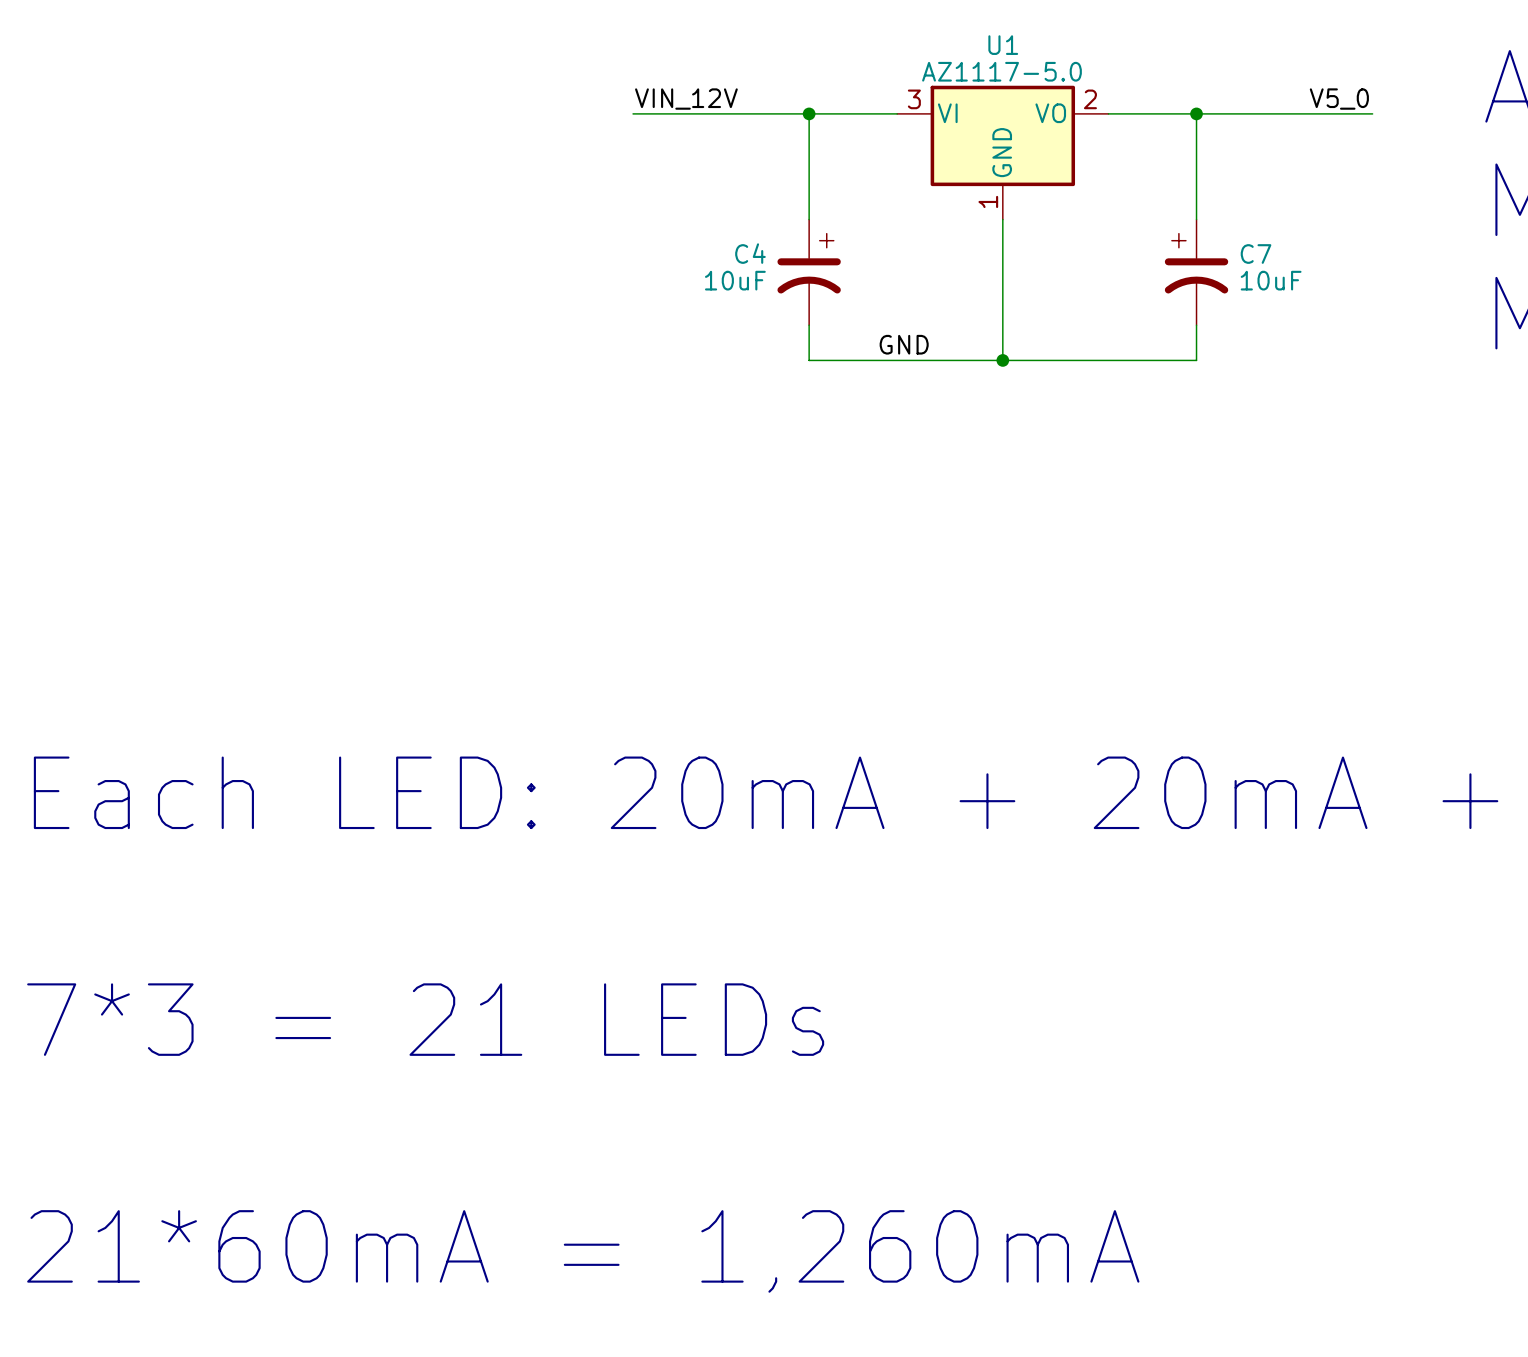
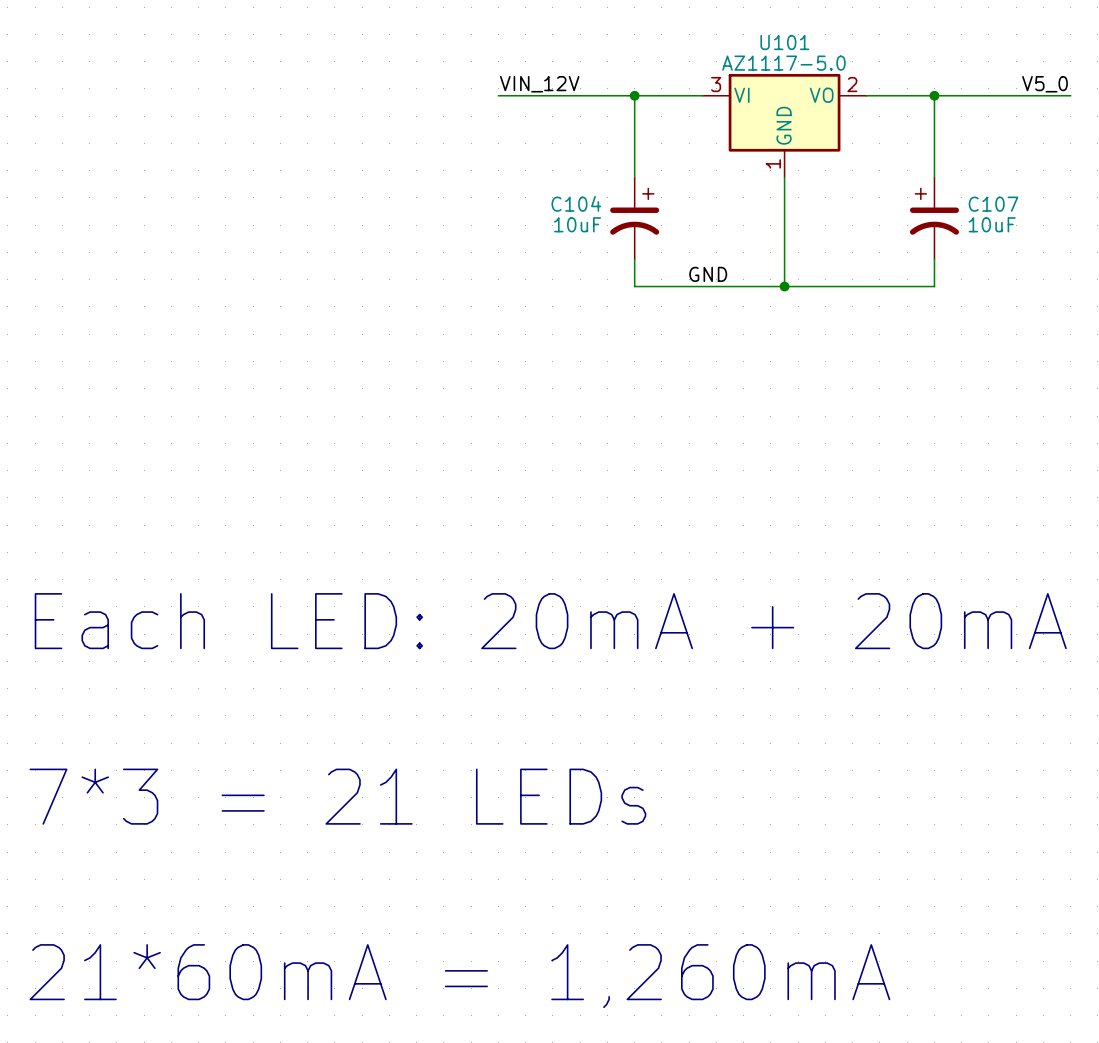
U1 name: U1 (1003, 45) -> U101 (784, 42)
C4 name: C4 (750, 253) -> C104 (576, 203)
C7 name: C7 (1256, 254) -> C107 (993, 204)

